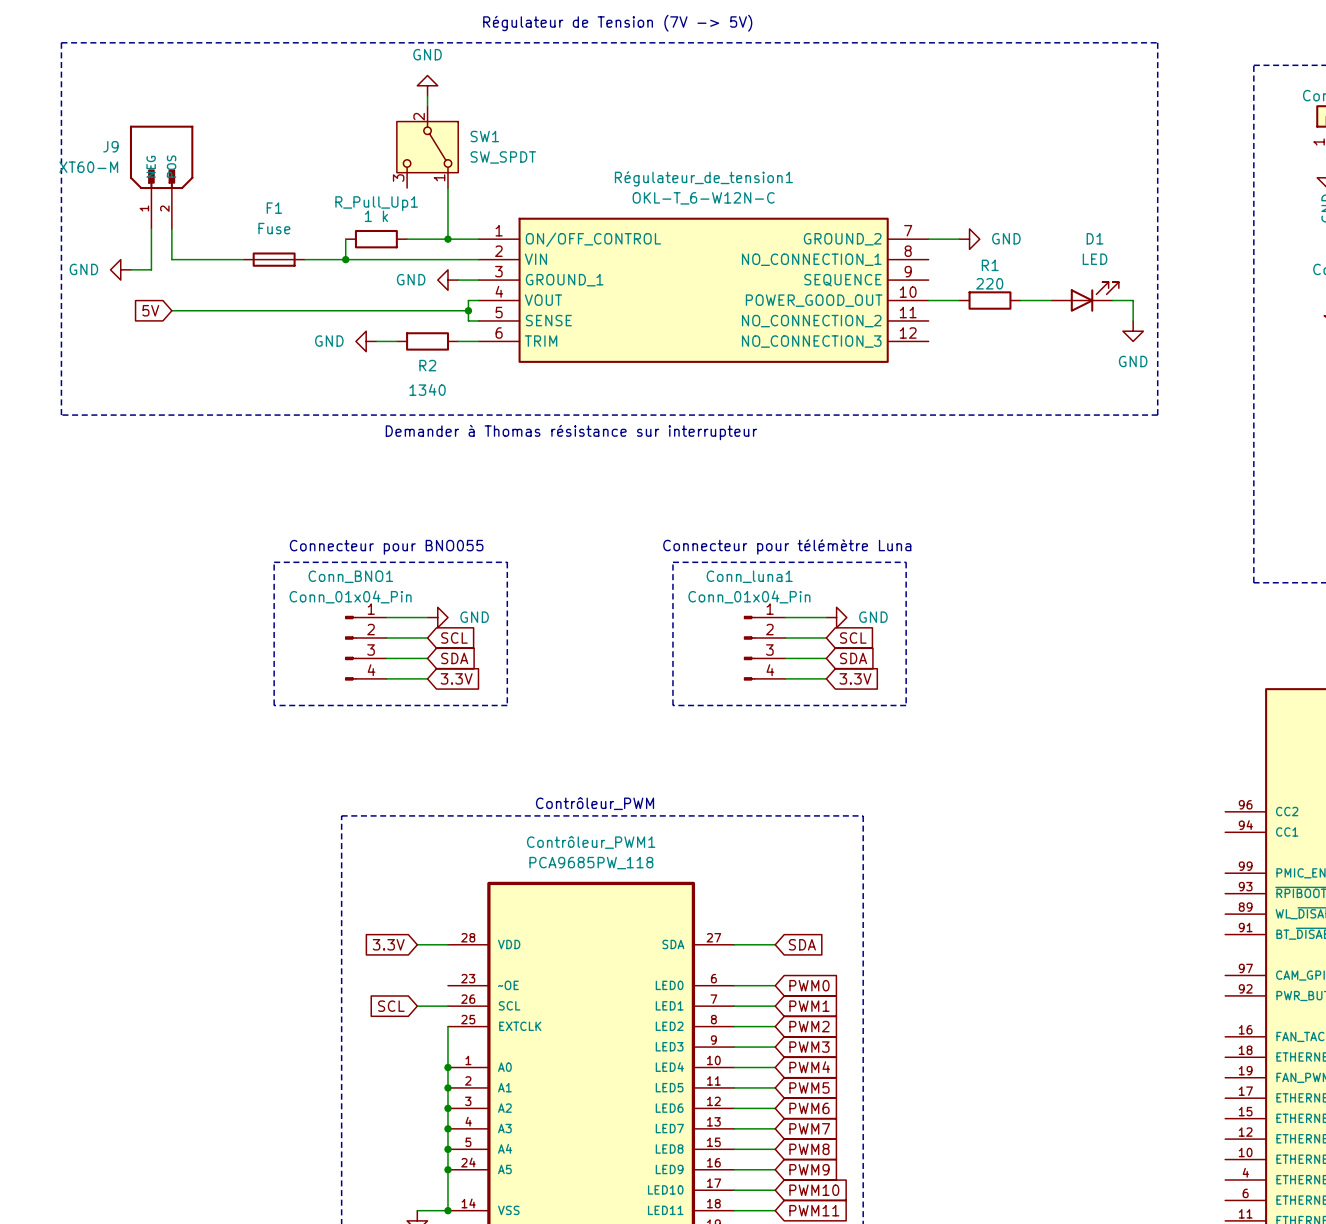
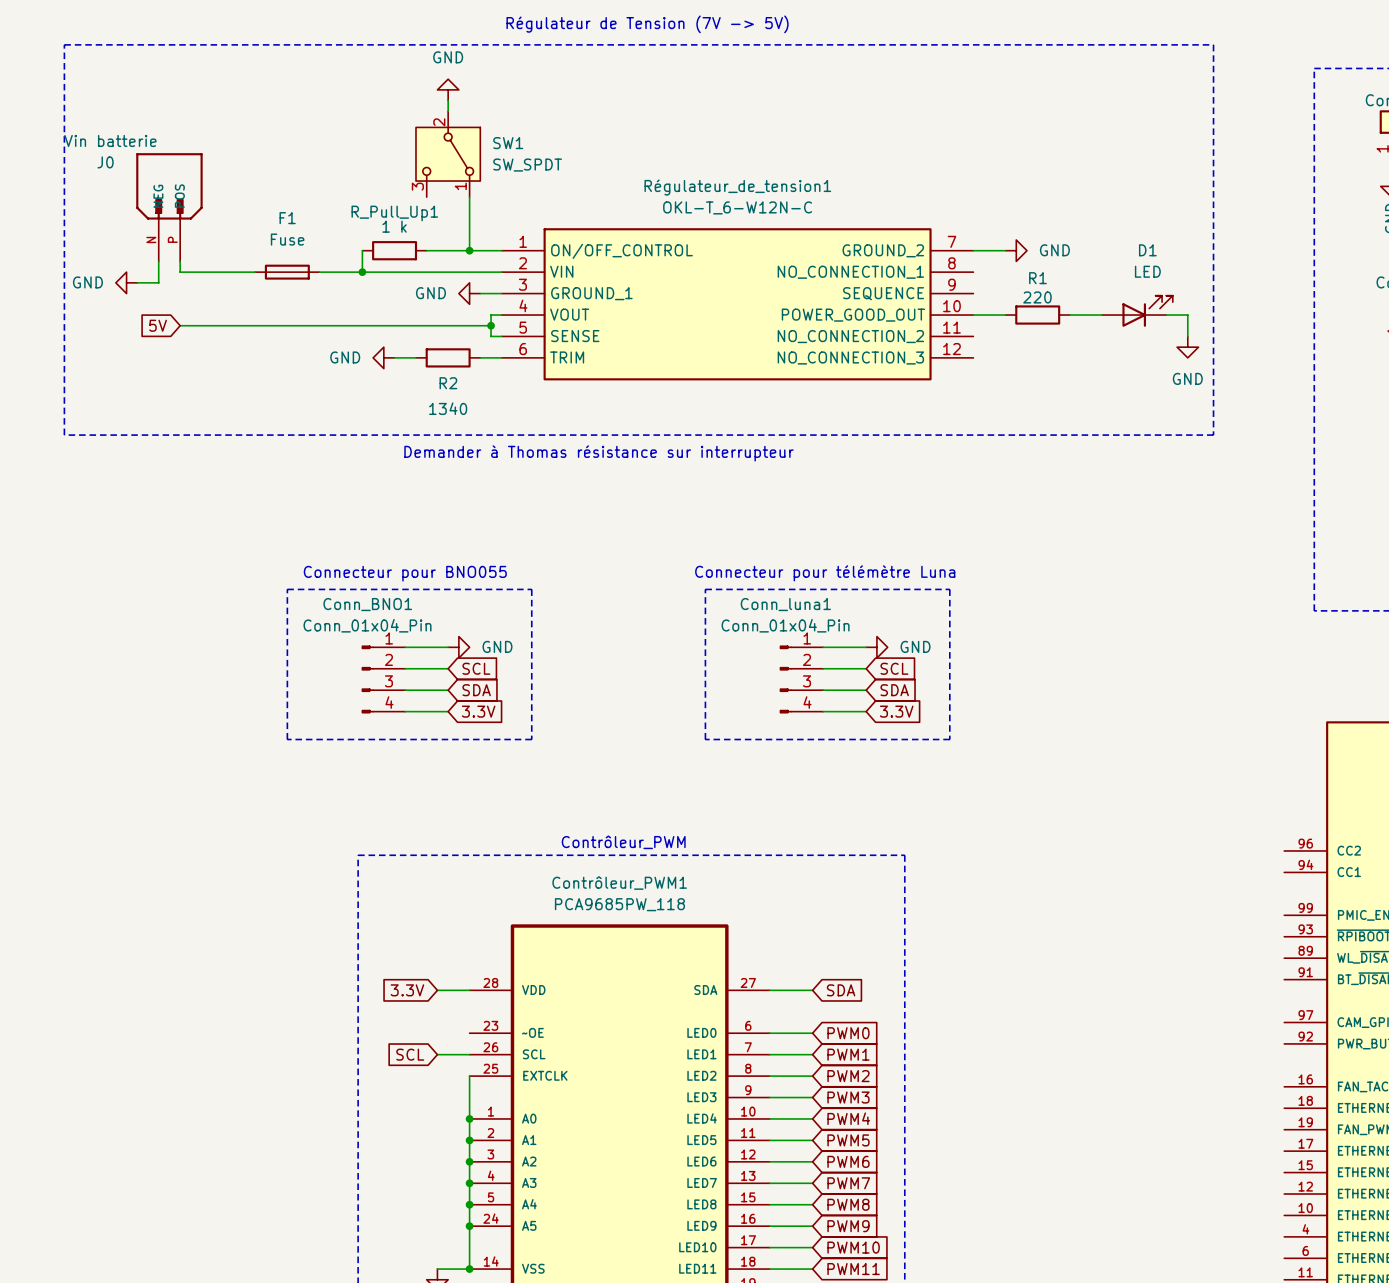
J9: XT60-M (161, 177) -> none
J0: none -> Vin batterie (169, 207)

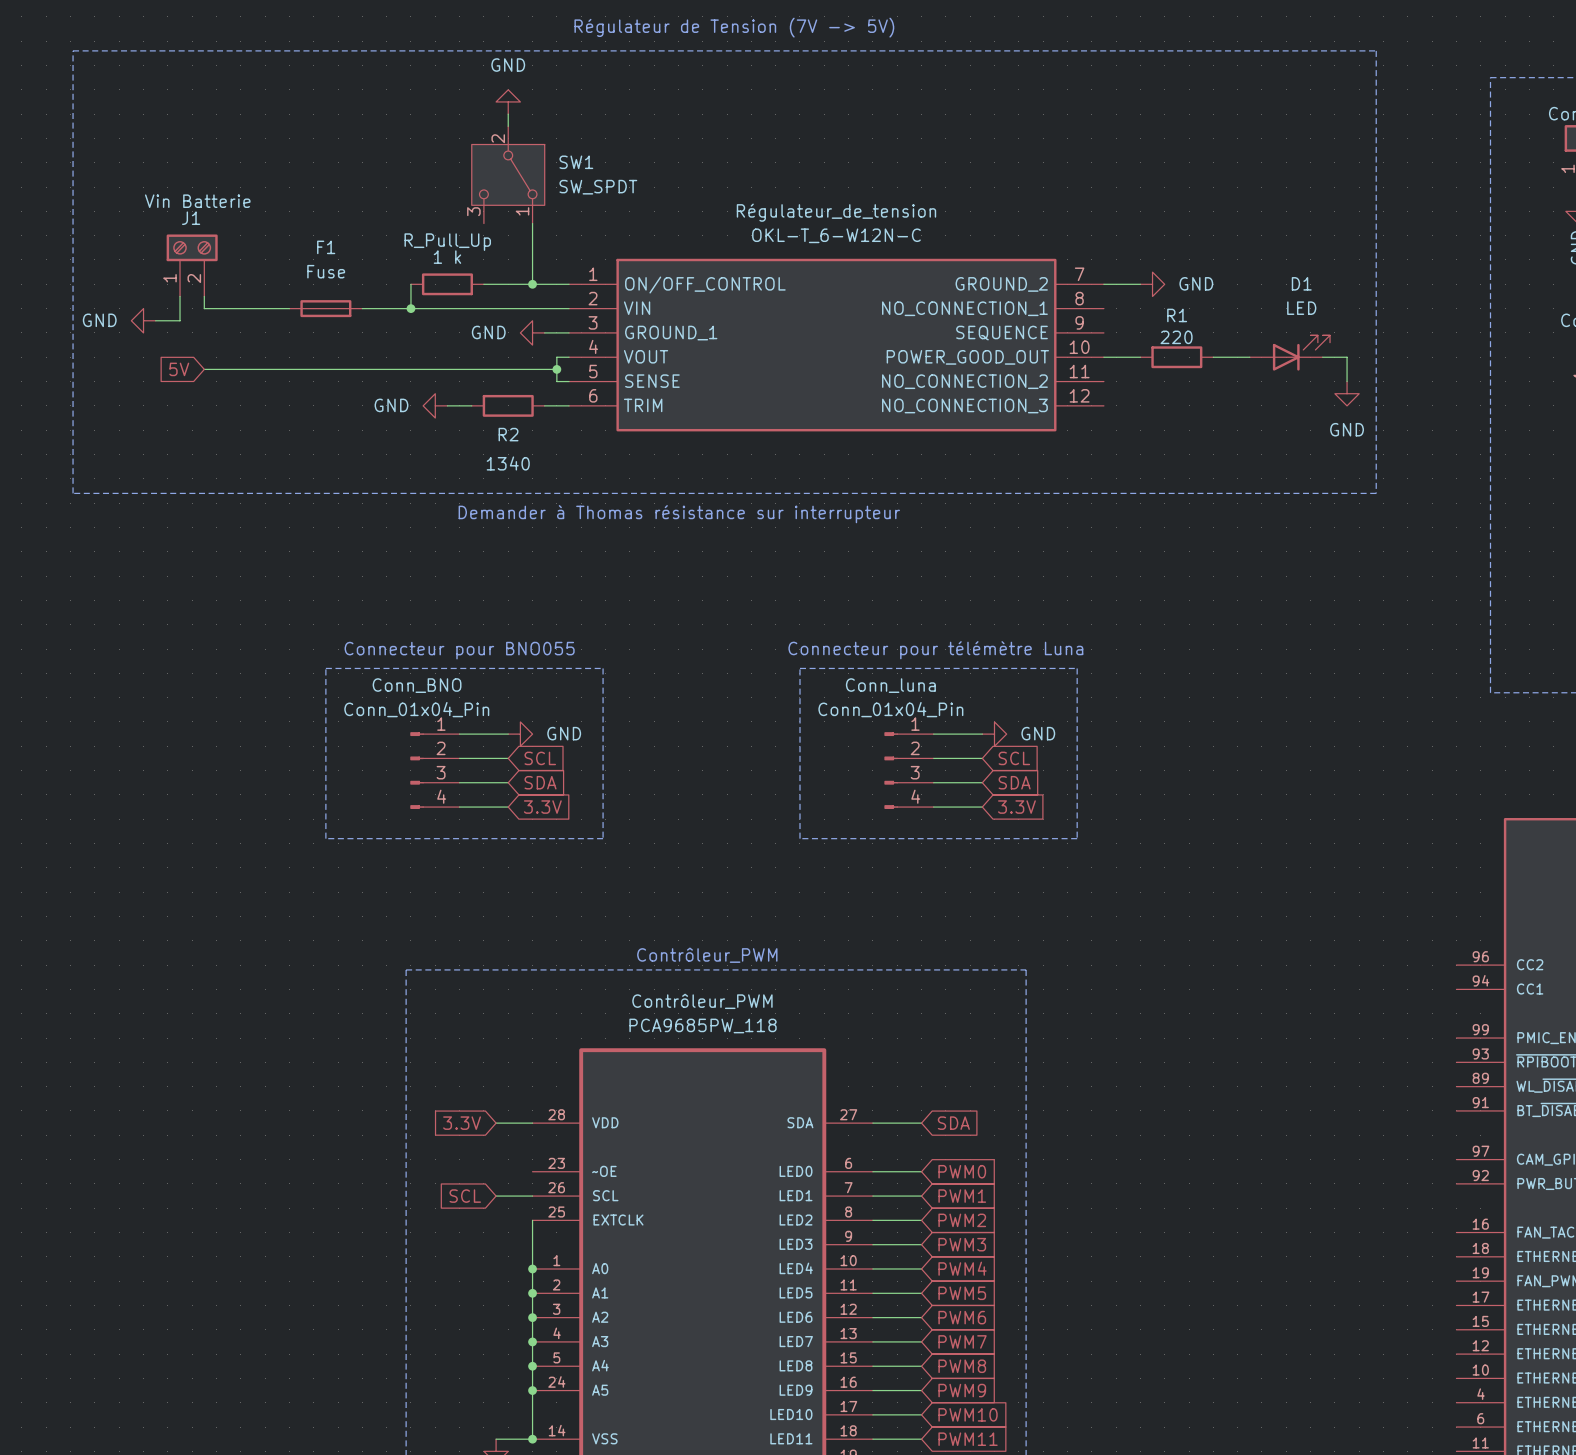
Régulateur_de_tension1 name: Régulateur_de_tension1 (737, 187) -> Régulateur_de_tension (836, 212)
J0: Vin batterie (169, 207) -> none
R_Pull_Up1 name: R_Pull_Up1 (394, 213) -> R_Pull_Up (447, 242)
J1: none -> Vin Batterie (192, 265)
Conn_BNO1 name: Conn_BNO1 (367, 604) -> Conn_BNO (417, 685)
Conn_luna1 name: Conn_luna1 (785, 604) -> Conn_luna (890, 685)
Contrôleur_PWM1 name: Contrôleur_PWM1 (619, 883) -> Contrôleur_PWM (702, 1001)

